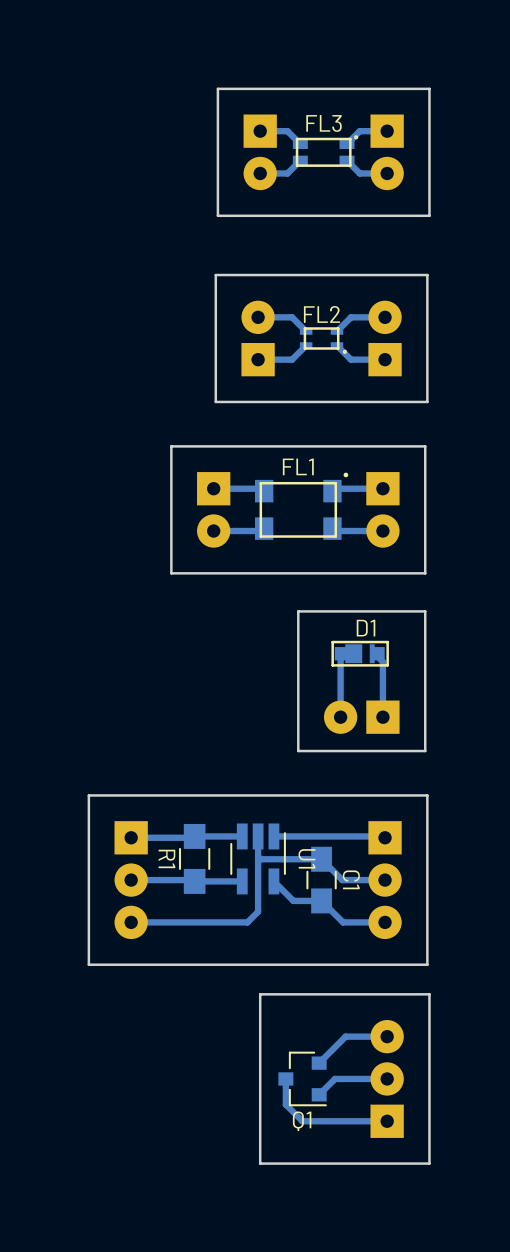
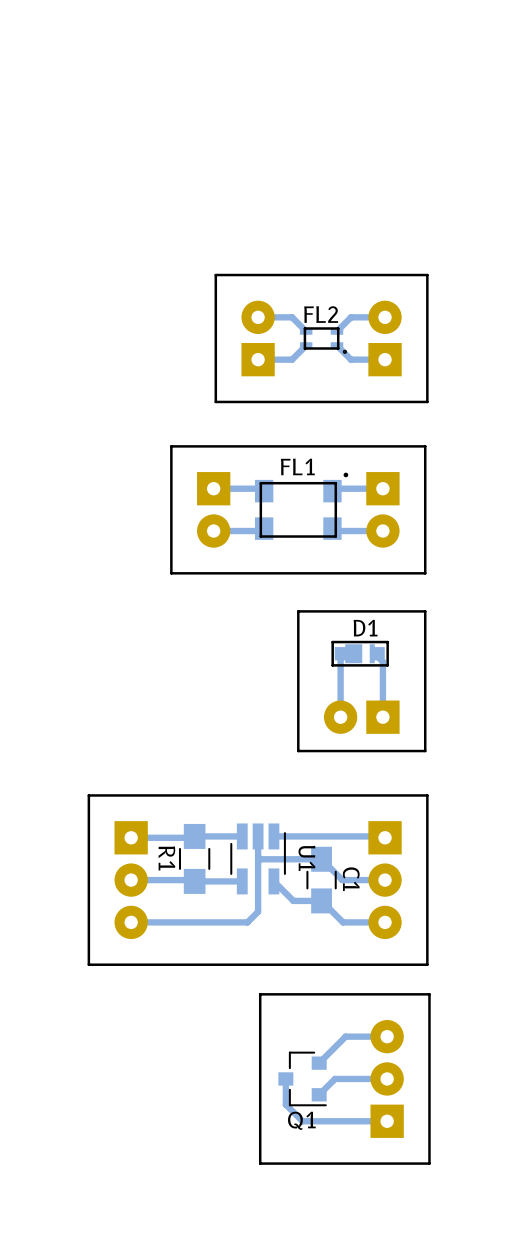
board edge: (429, 88) (429, 215) (217, 215) (217, 88) (429, 88) -> none
track: (260, 131) (287, 131) (300, 143) -> none
track: (387, 131) (359, 131) (347, 143) -> none
FL3: (325, 151) -> none
part: (260, 152) -> none
part: (387, 152) -> none
track: (300, 160) (287, 173) (260, 173) -> none
track: (347, 160) (359, 173) (387, 173) -> none

